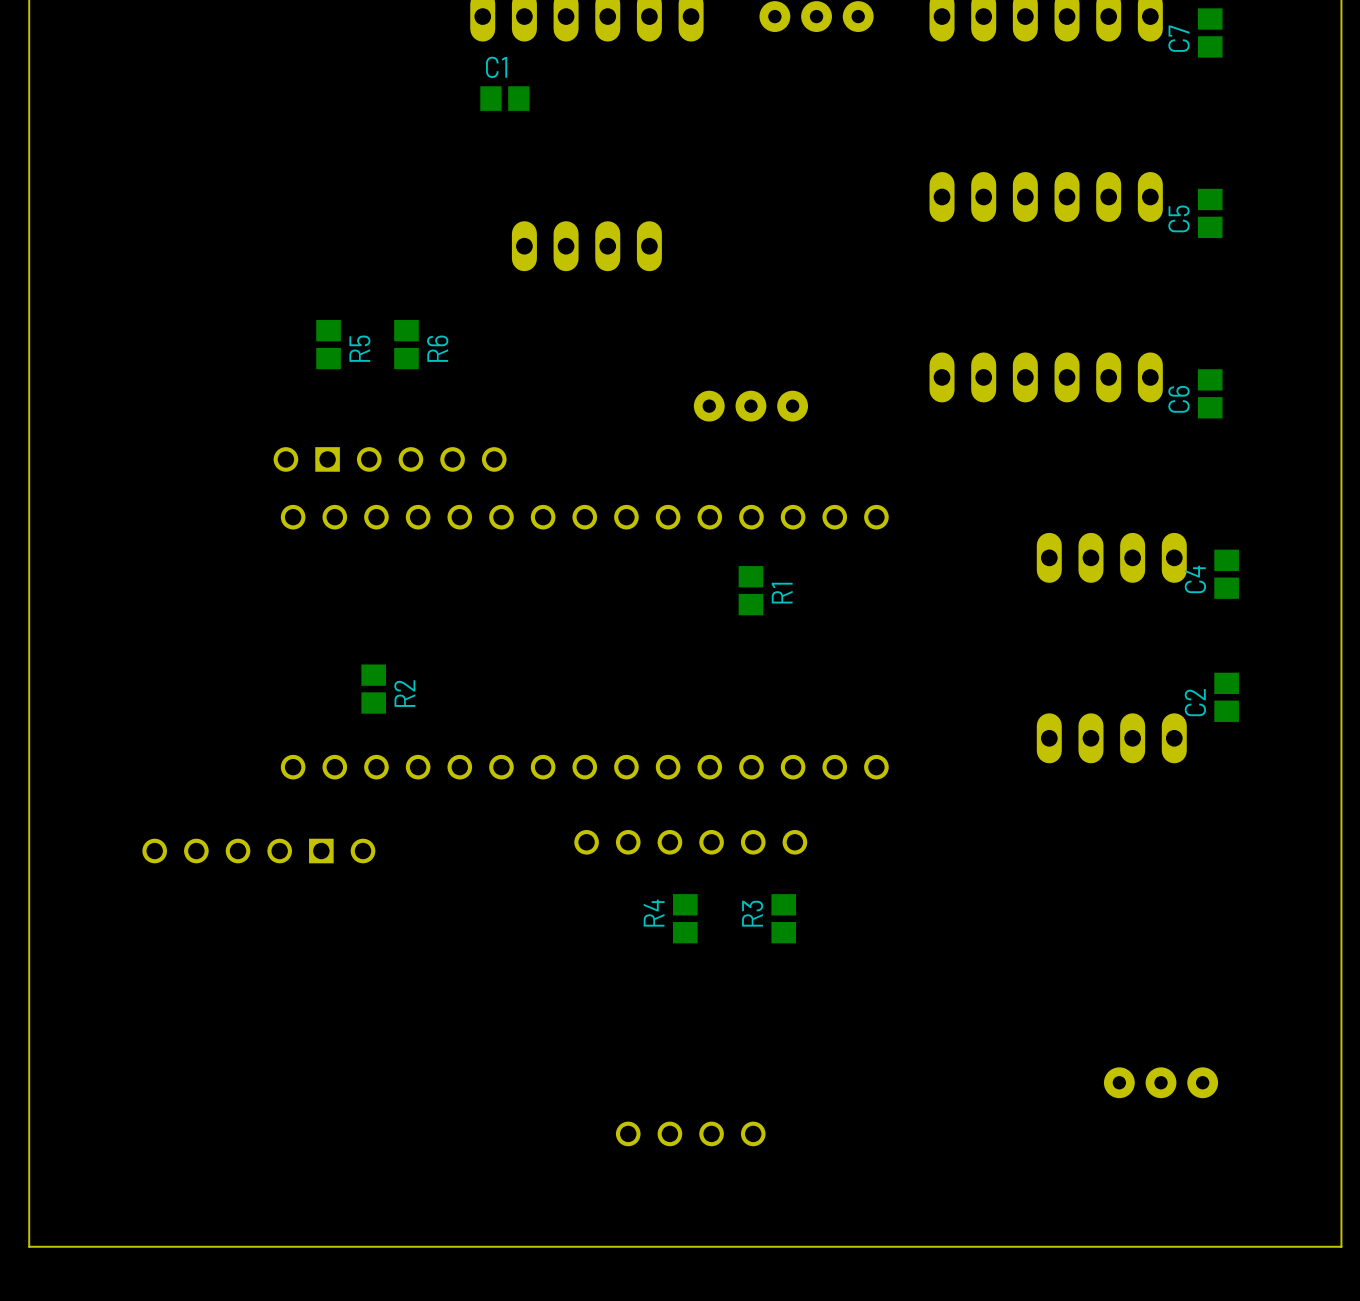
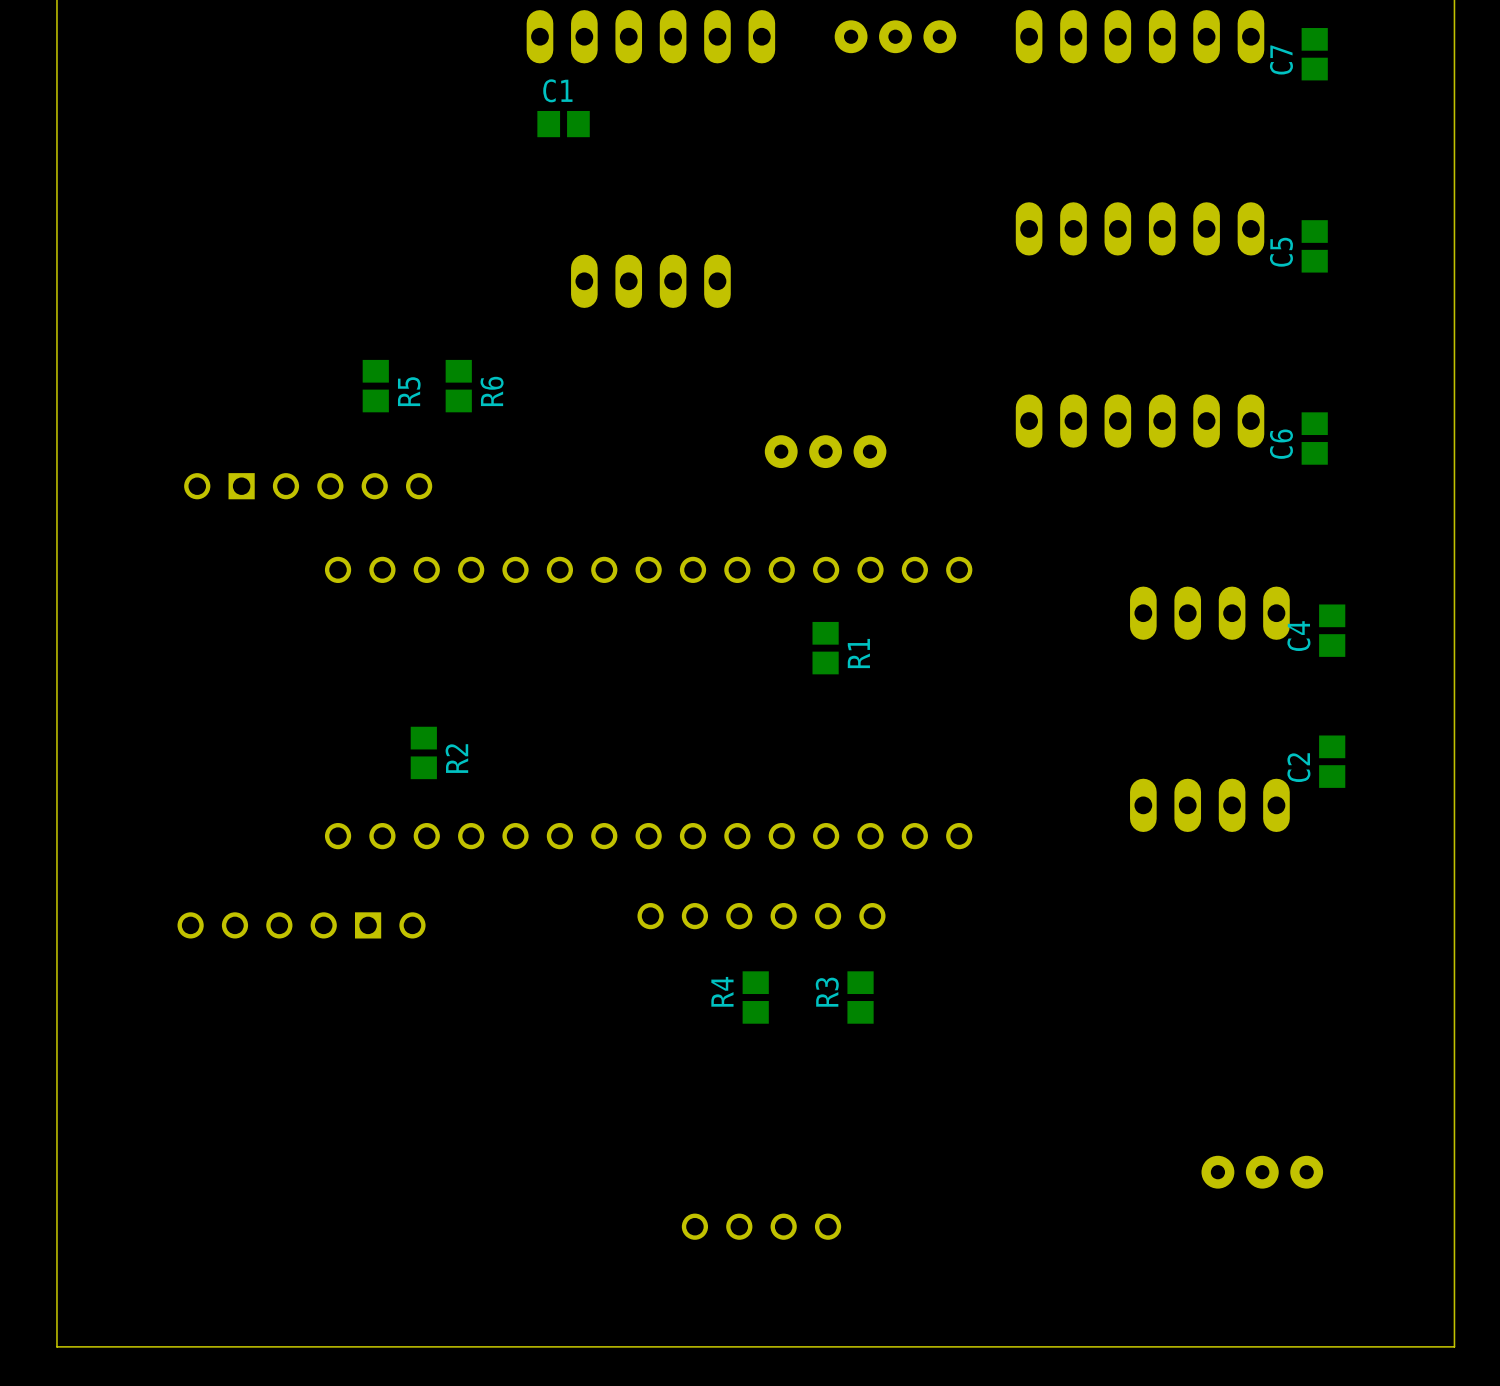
part position: (390, 459) -> (308, 486)

